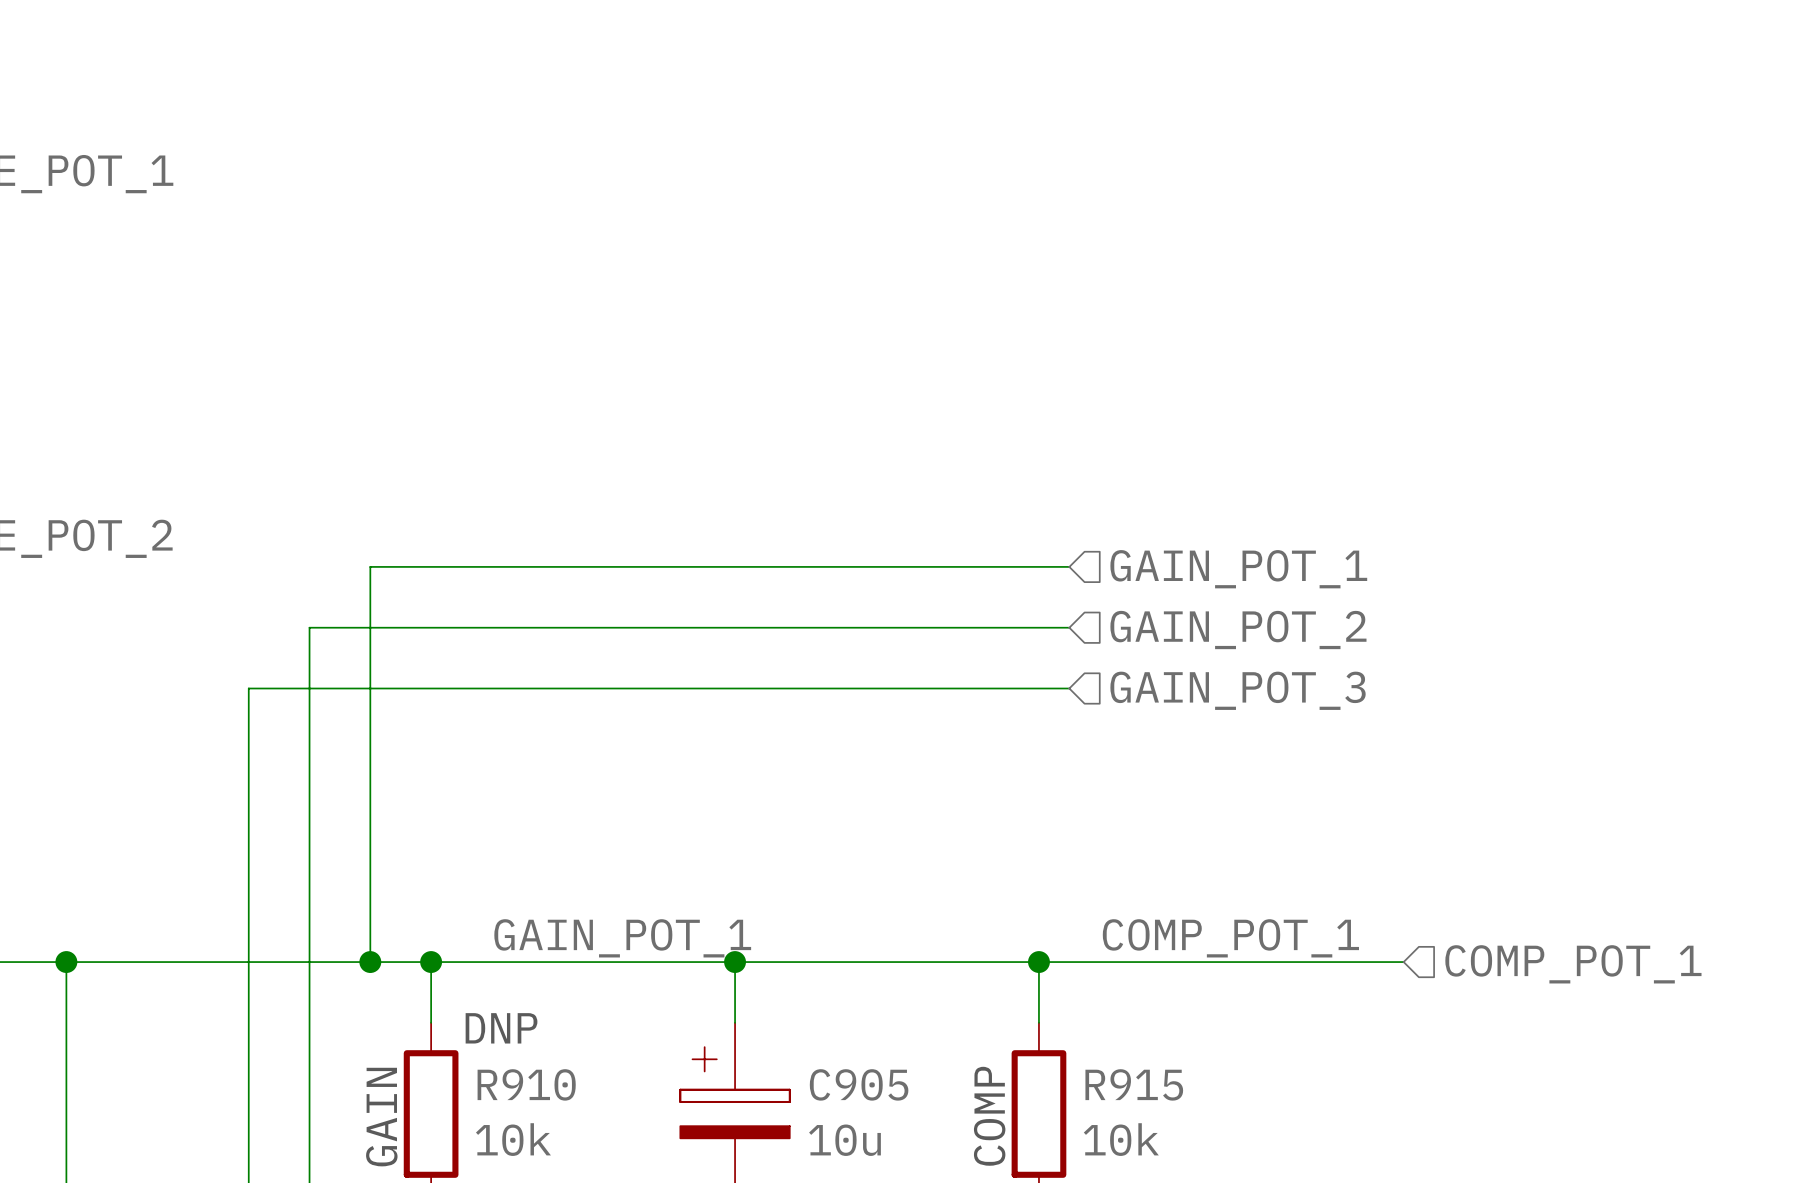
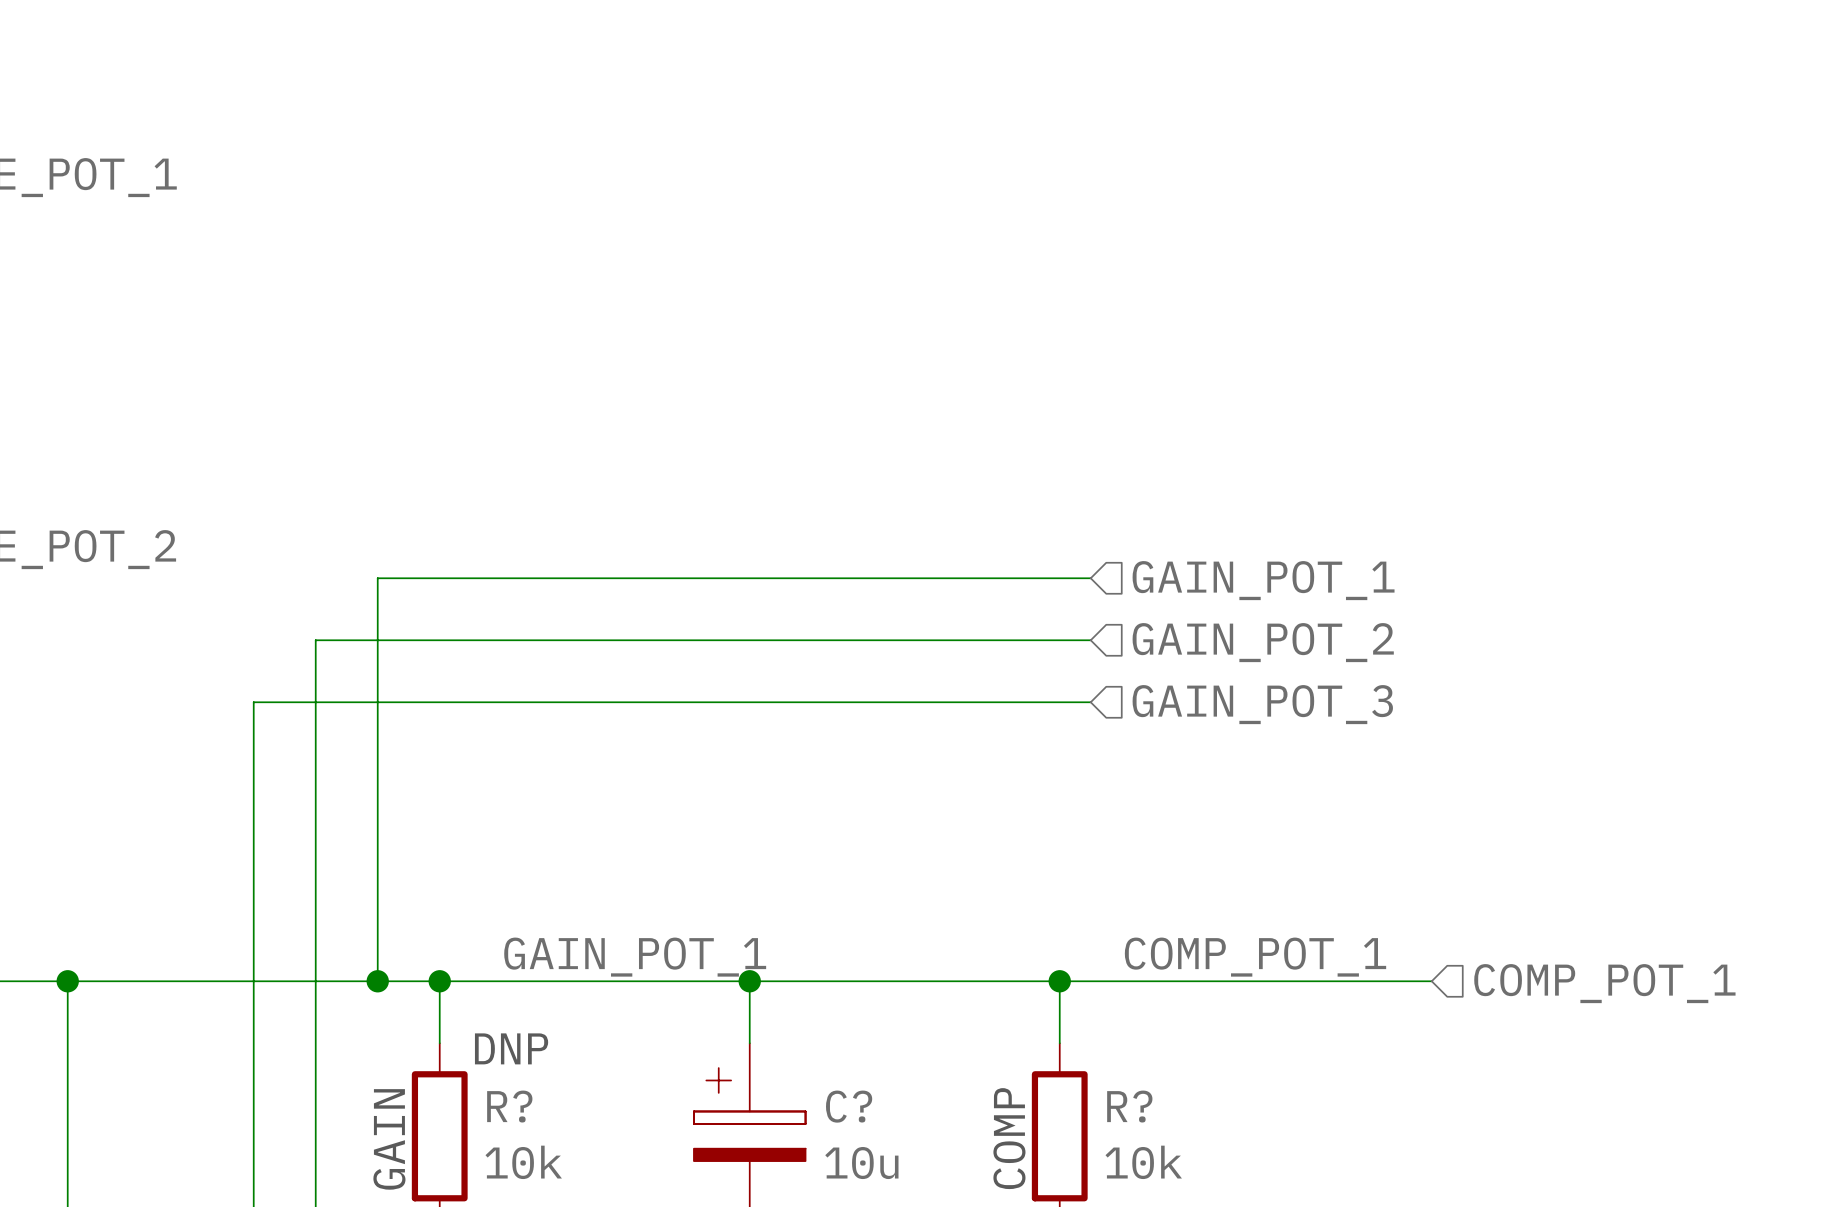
R910 name: R910 (526, 1084) -> R? (509, 1106)
C905 name: C905 (859, 1084) -> C? (849, 1106)
R915 name: R915 (1134, 1084) -> R? (1129, 1106)

